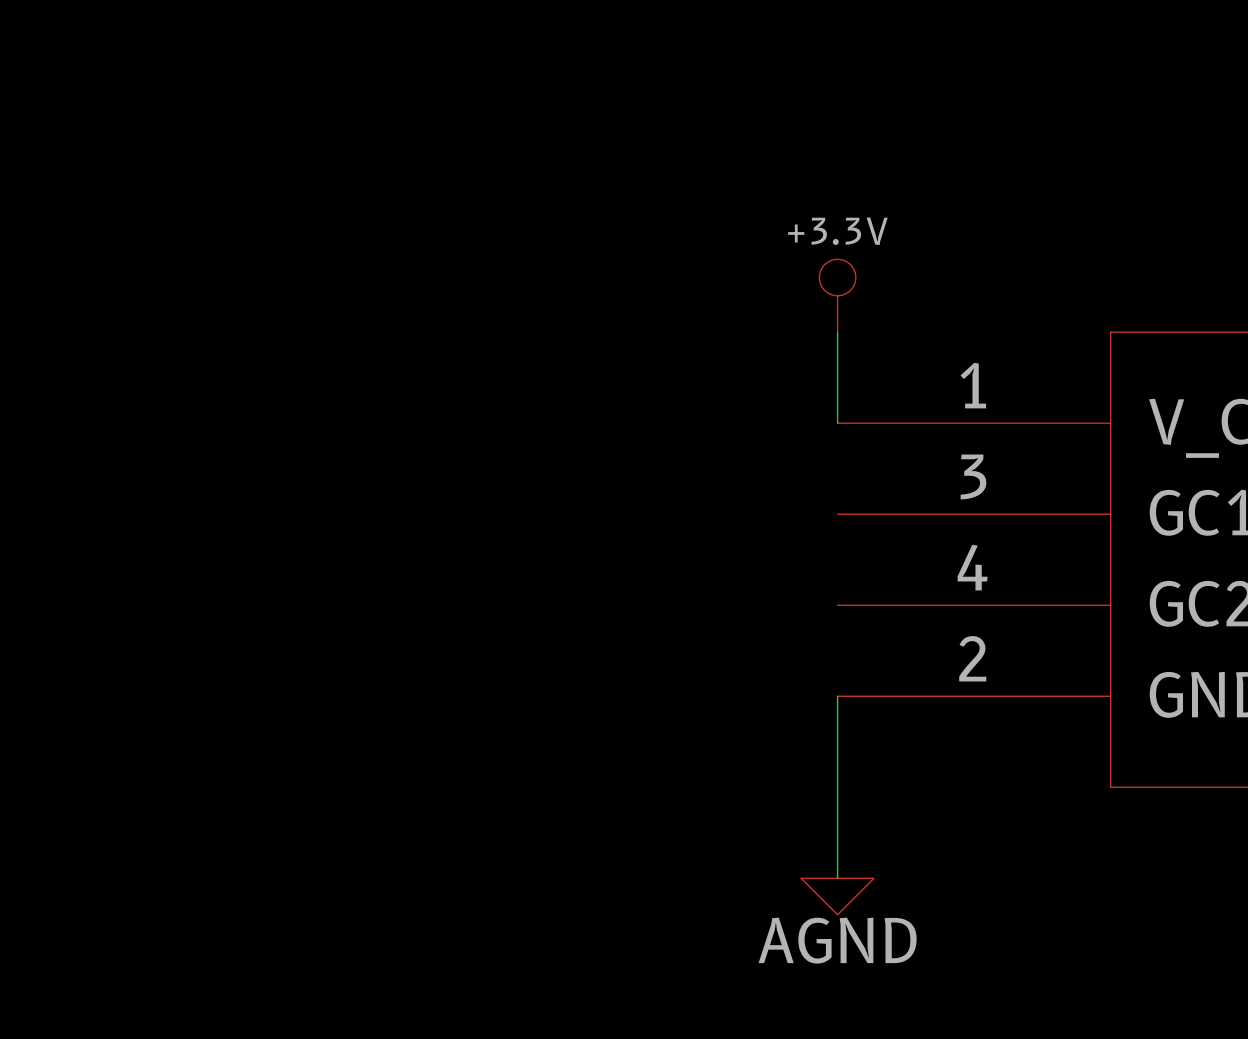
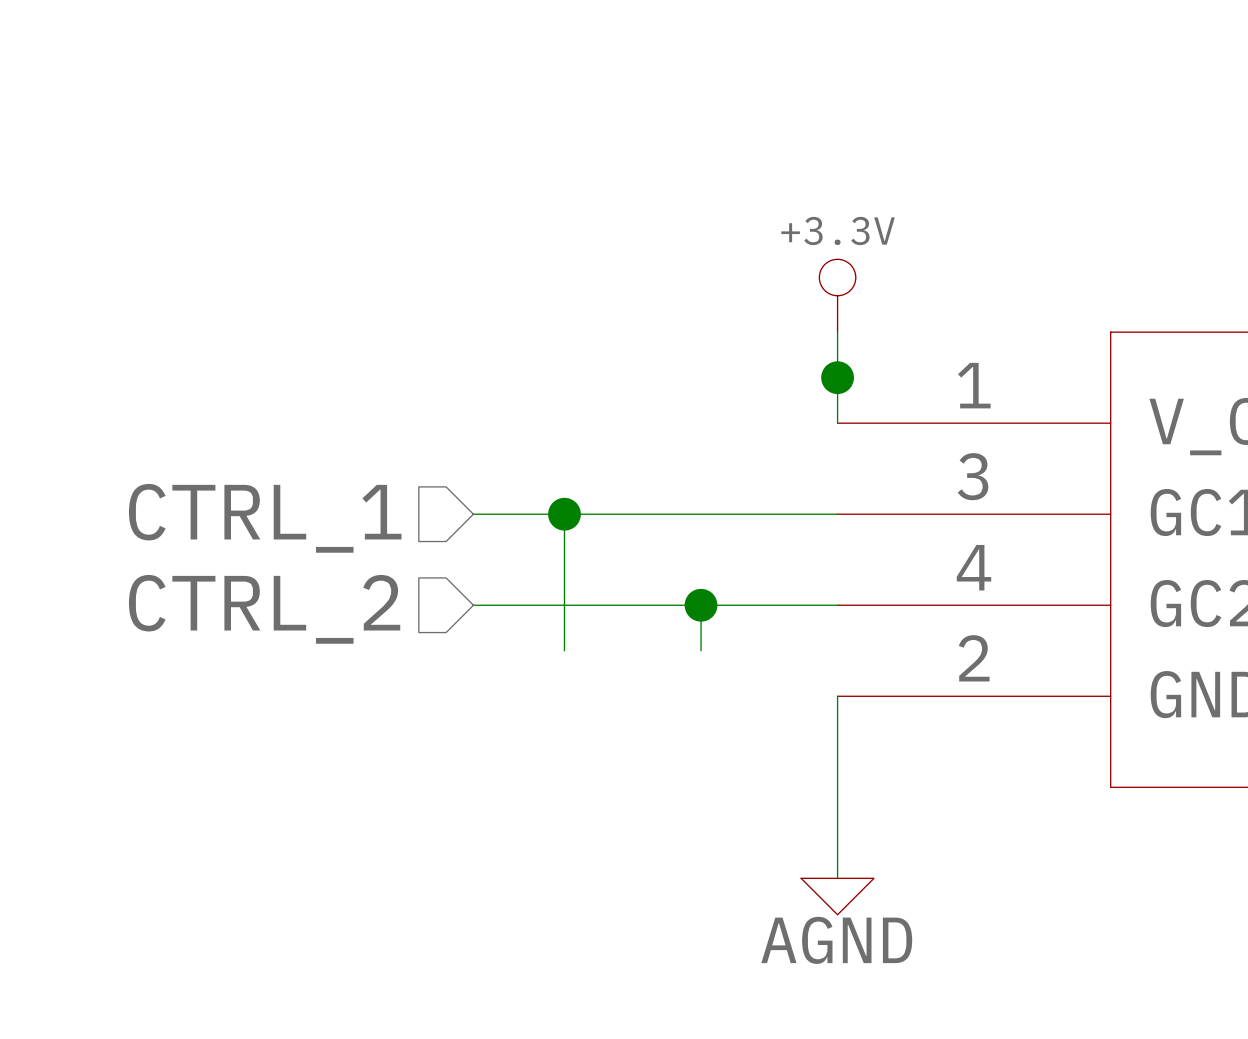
junction: none -> (837, 377)
wire: none -> (473, 514) (837, 514)
wire: none -> (564, 514) (564, 650)
junction: none -> (564, 514)
hierarchical label: none -> CTRL_1 (265, 518)
wire: none -> (473, 605) (837, 605)
wire: none -> (701, 605) (701, 650)
junction: none -> (701, 605)
hierarchical label: none -> CTRL_2 (264, 609)

